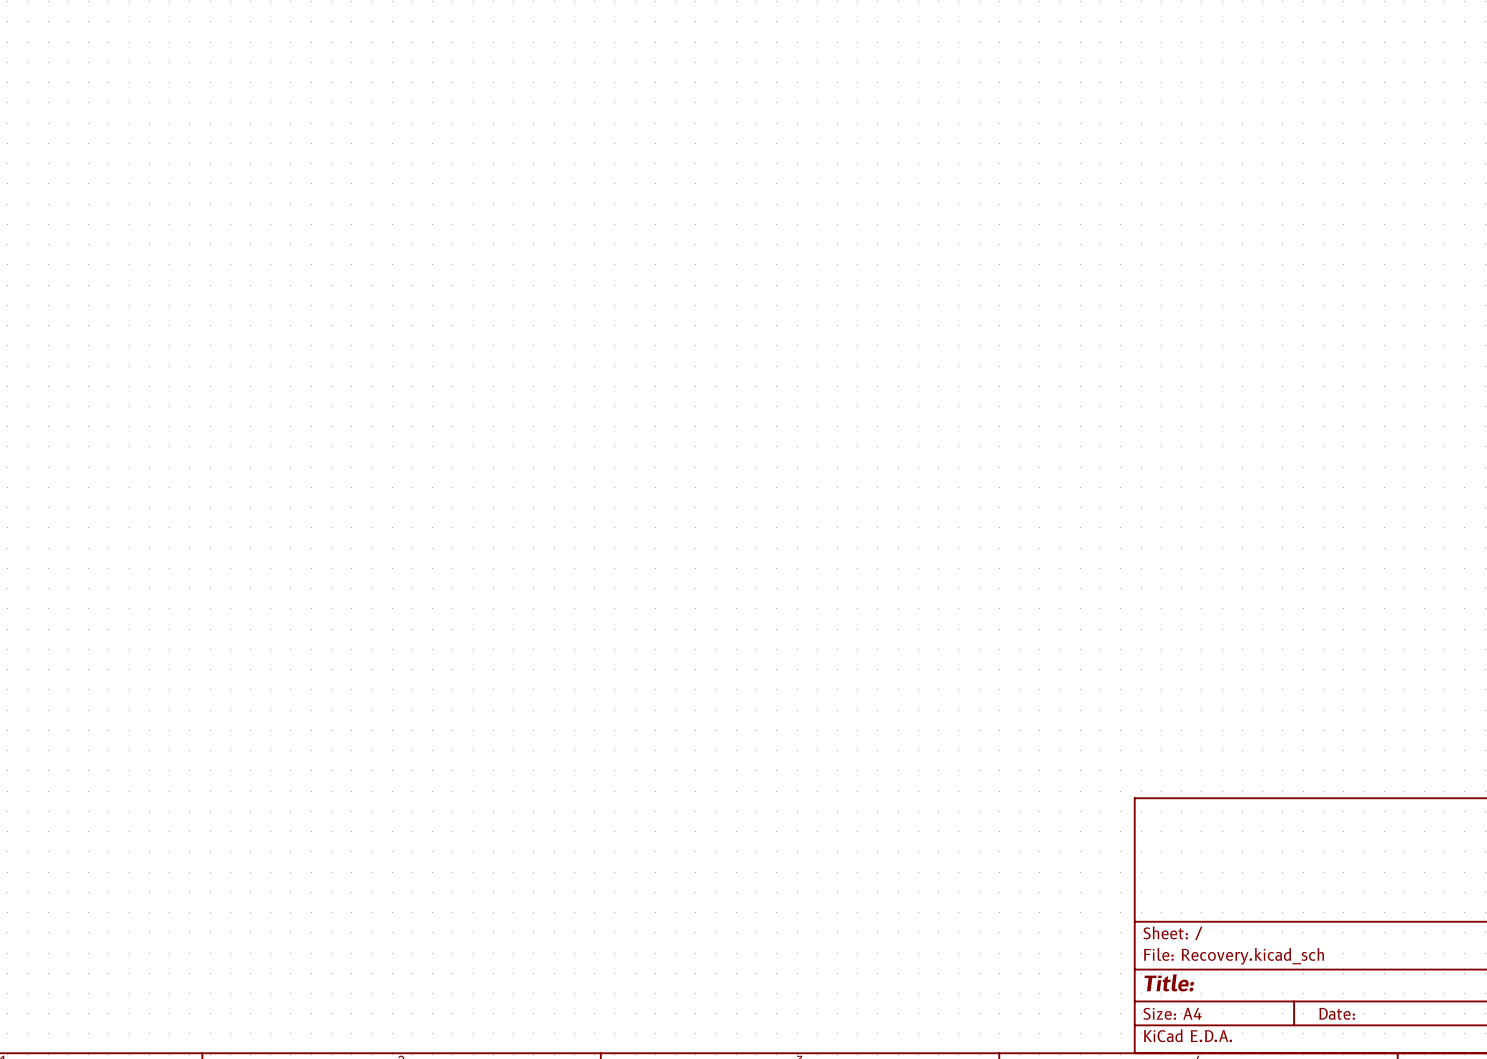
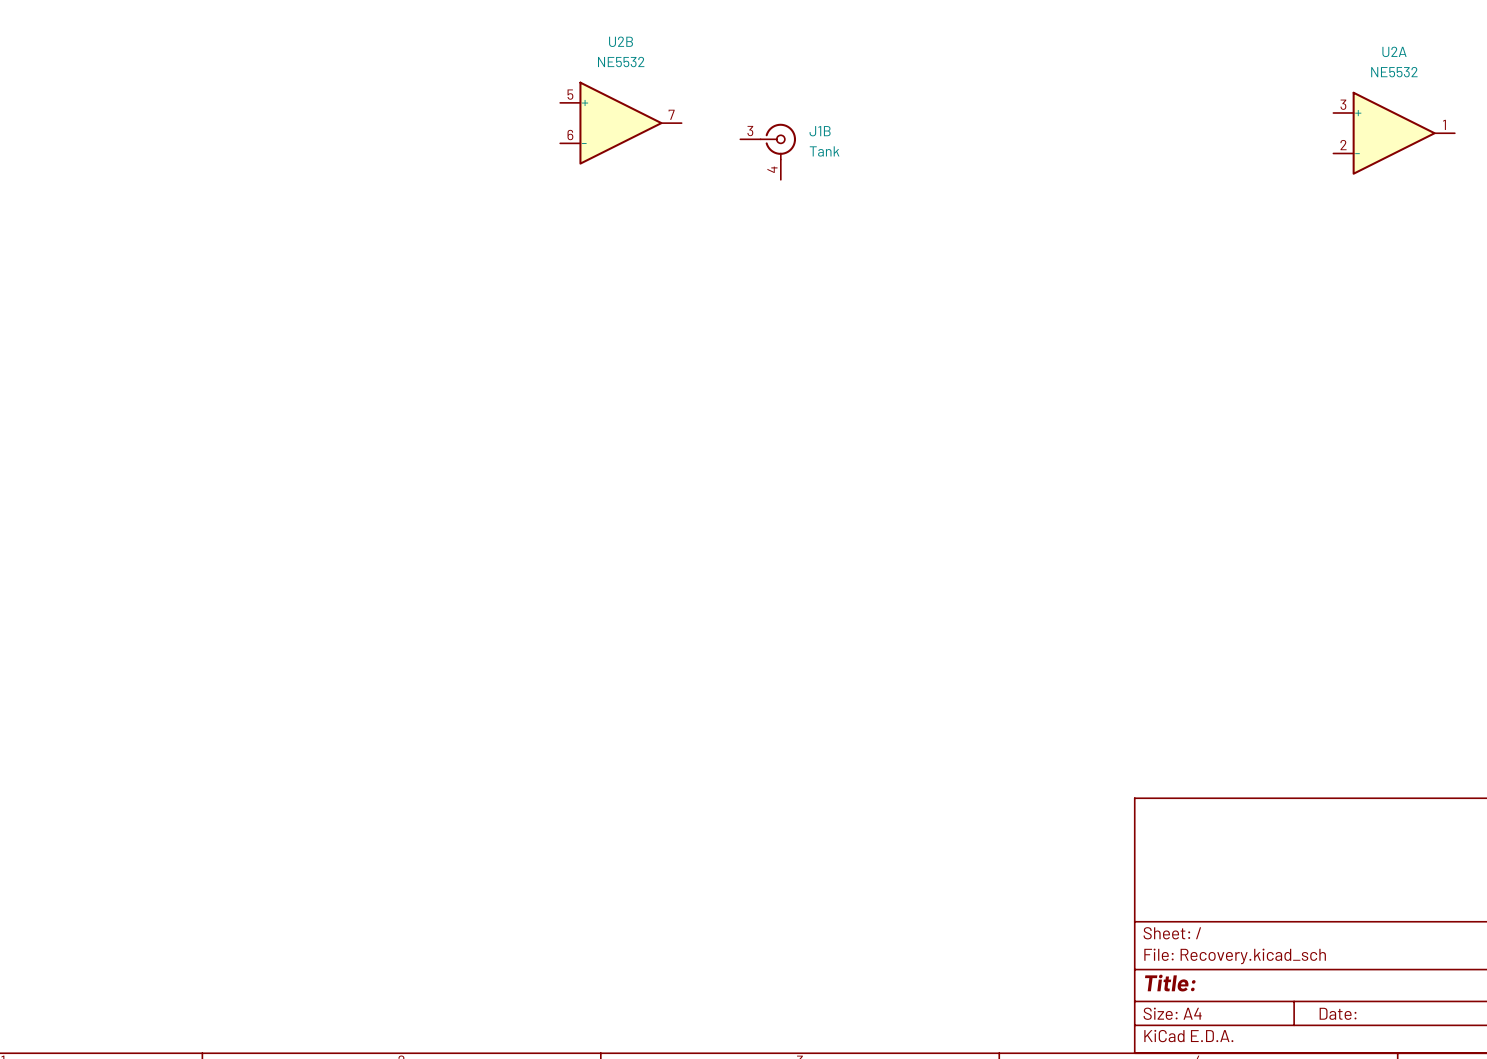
U2B: none -> NE5532 (620, 123)
U2A: none -> NE5532 (1394, 133)
J1B: none -> Tank (768, 151)

